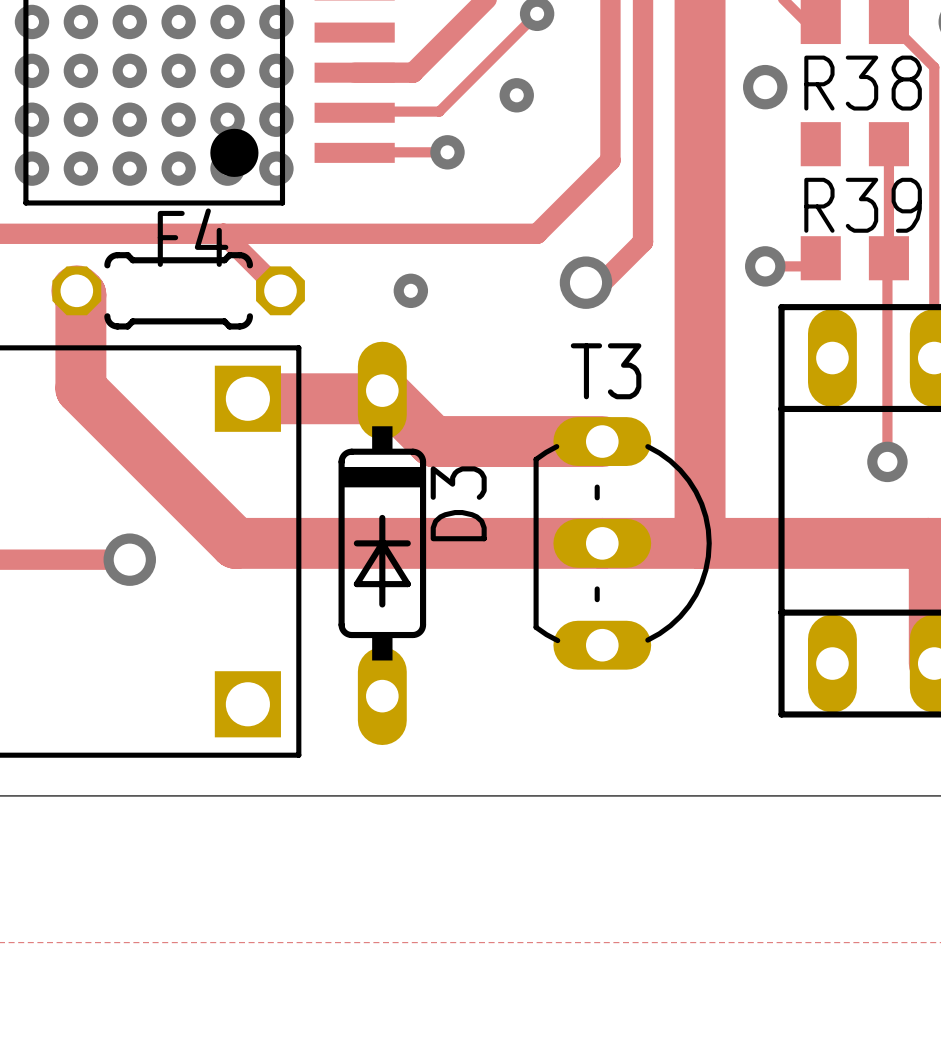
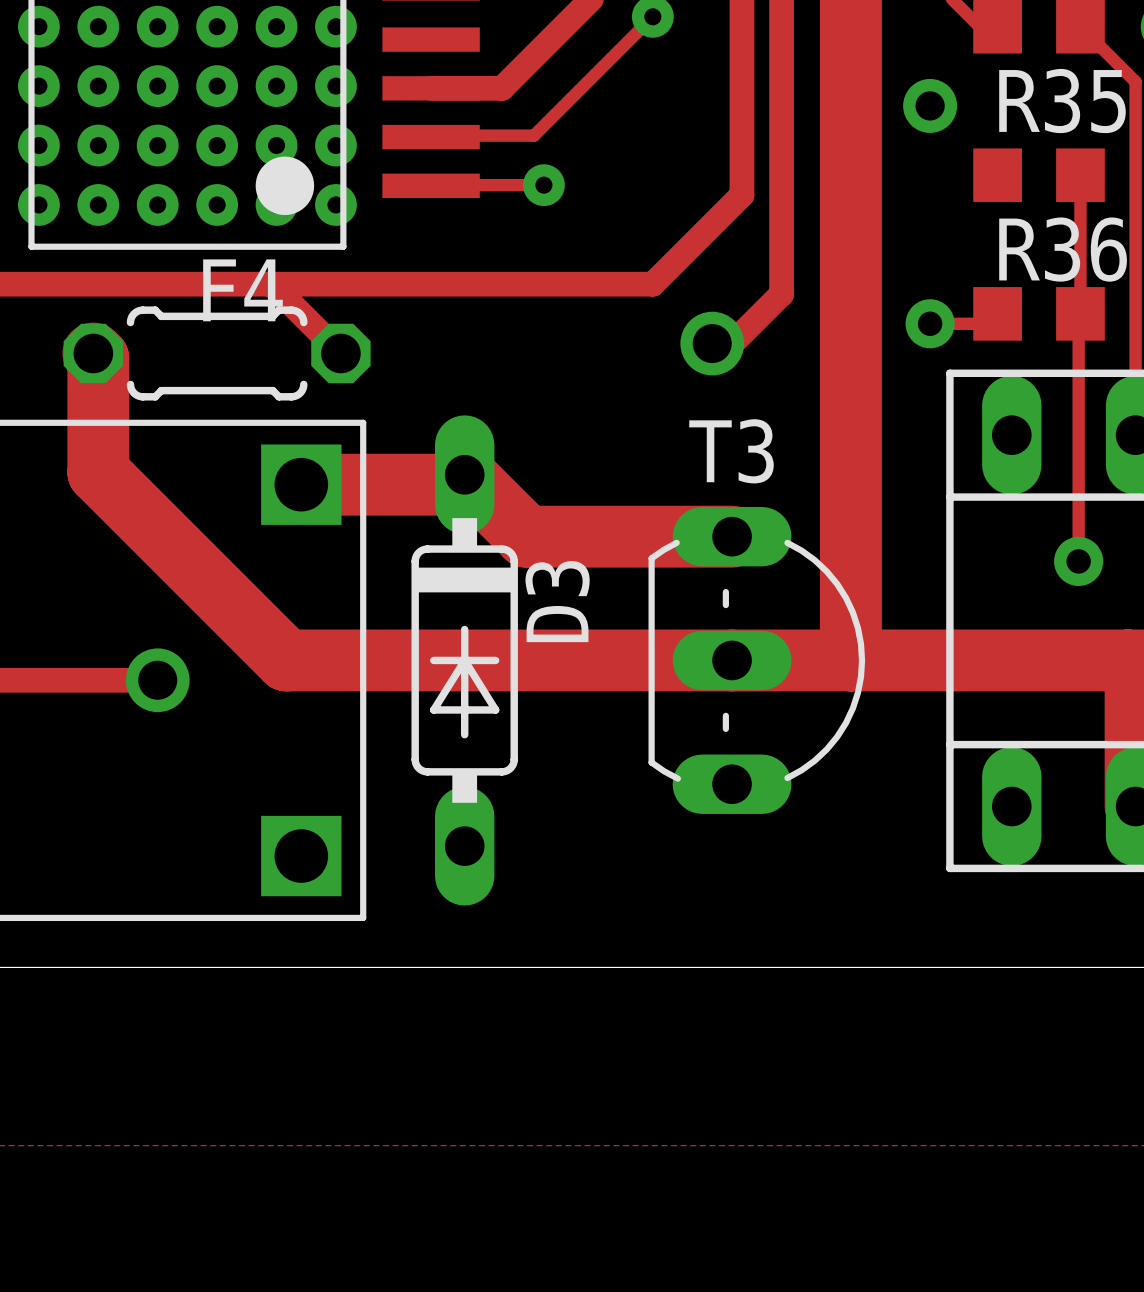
R38 name: R38 (863, 83) -> R35 (1062, 101)
via: (516, 95) -> none
R39 name: R39 (863, 205) -> R36 (1063, 249)
via: (410, 290) -> none

